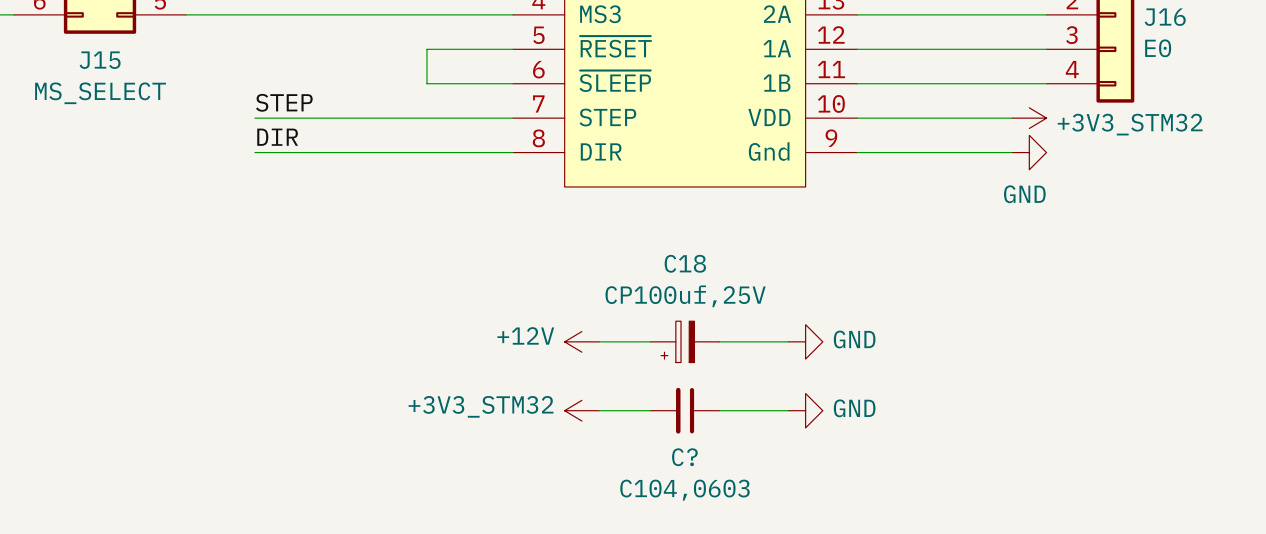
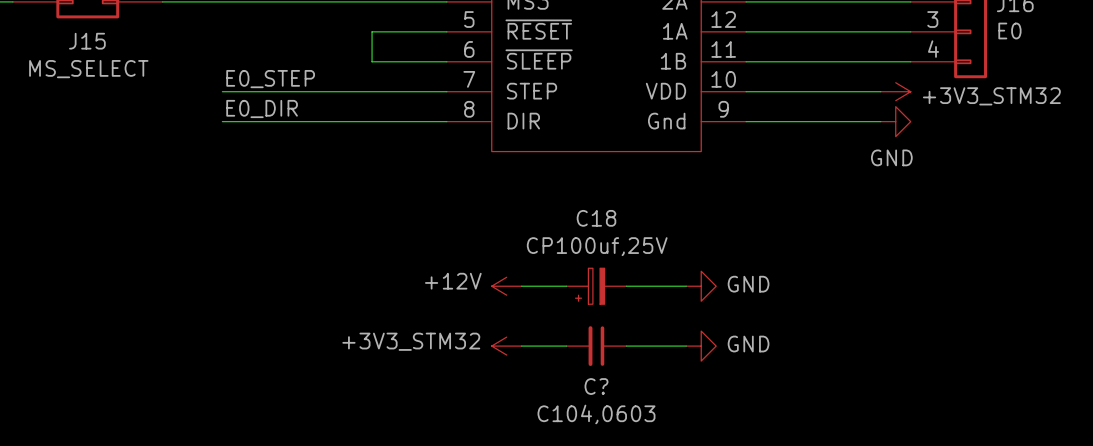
label: STEP (284, 102) -> E0_STEP (270, 79)
label: DIR (277, 137) -> E0_DIR (262, 109)

